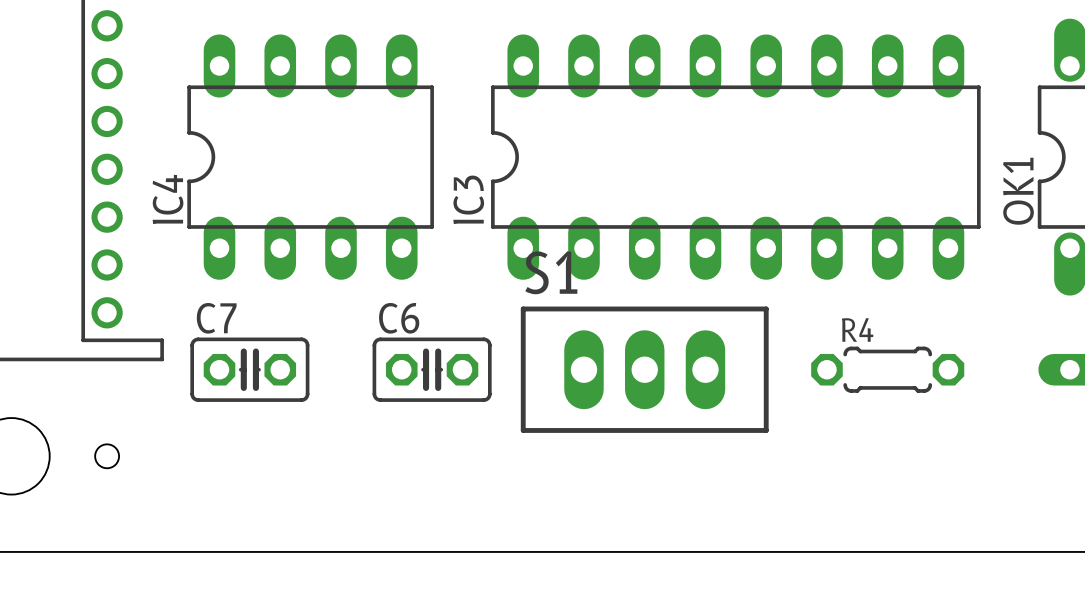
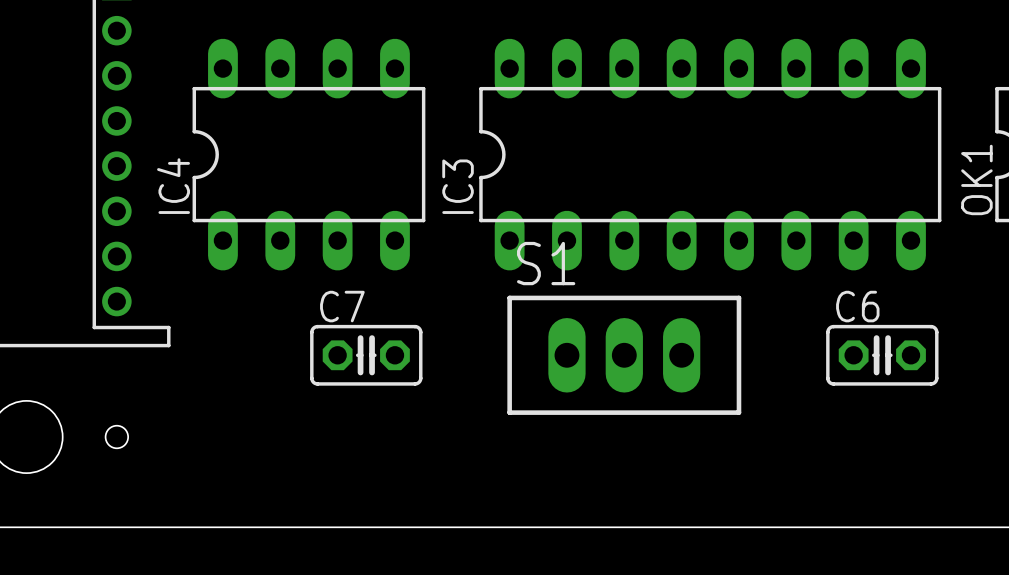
C7 position: (249, 369) -> (366, 355)
C6 position: (432, 369) -> (882, 355)
R4: (887, 369) -> none

